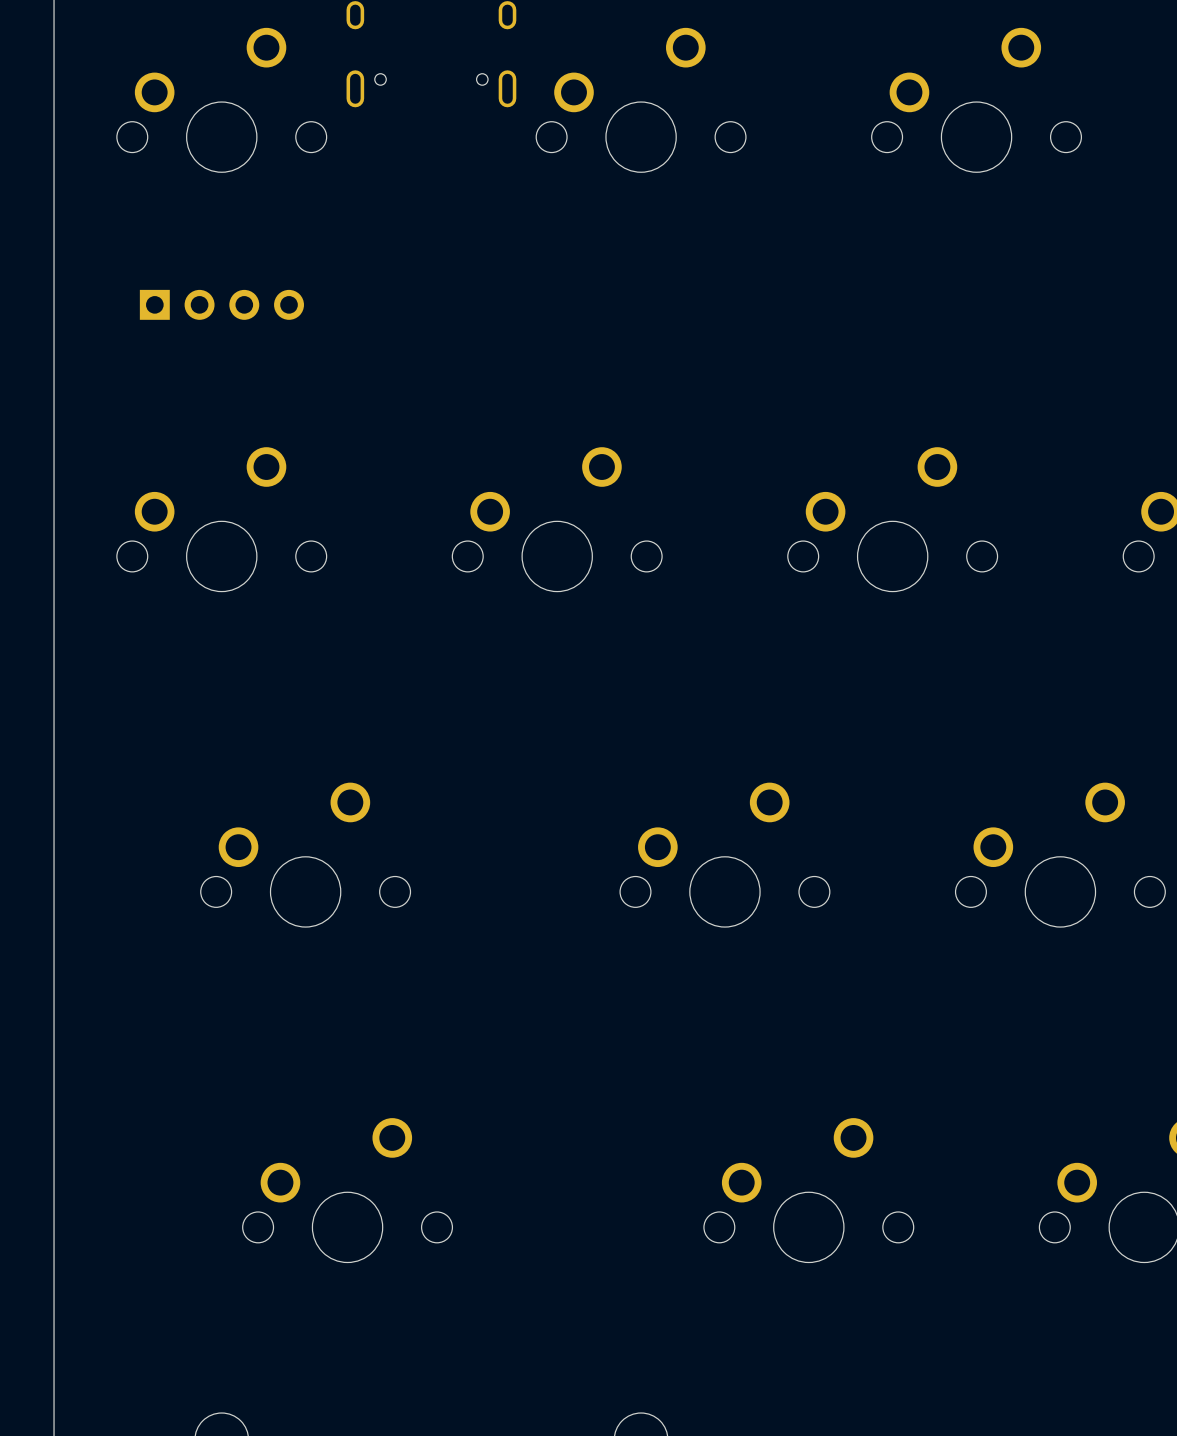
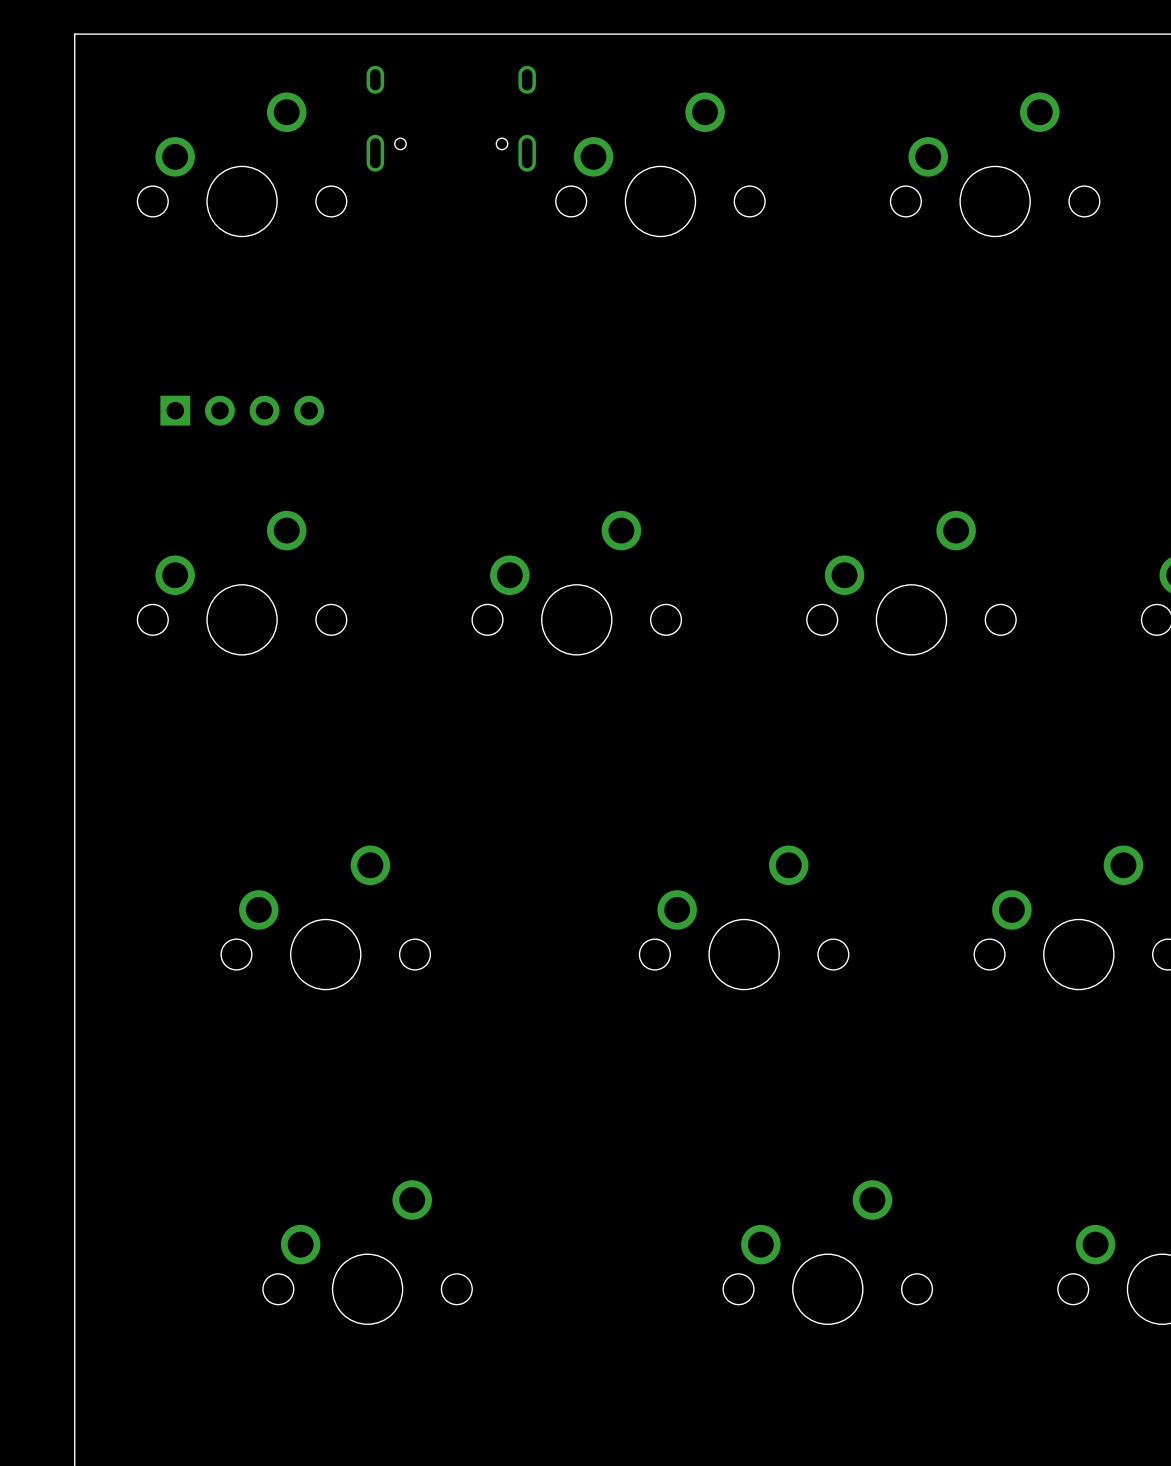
part position: (221, 304) -> (242, 410)

